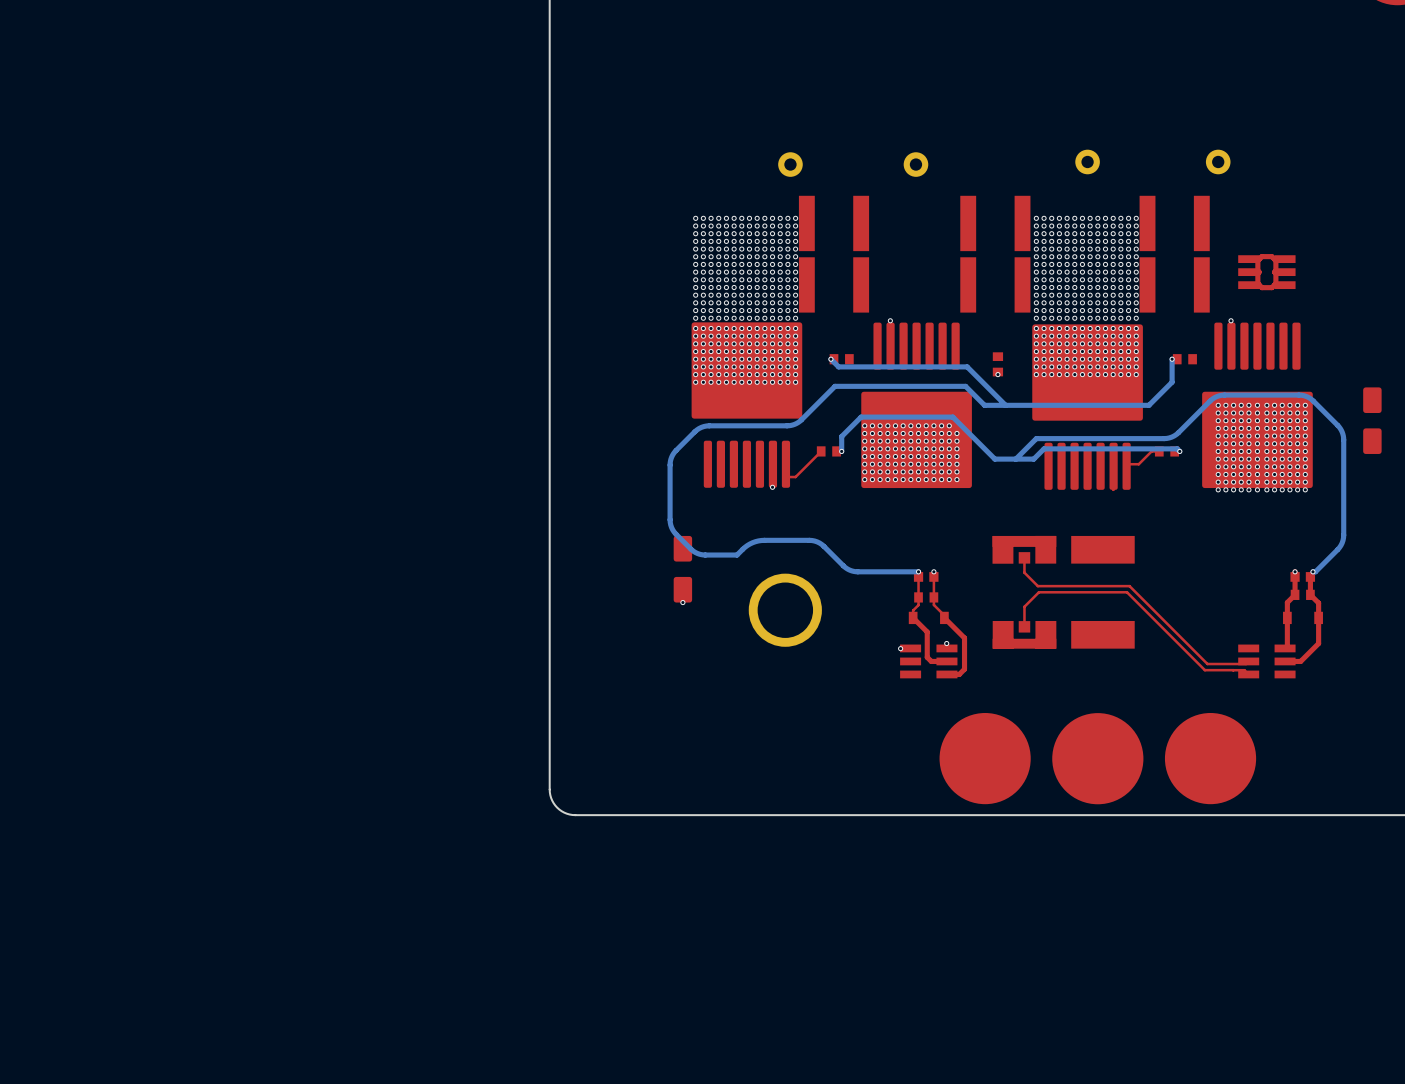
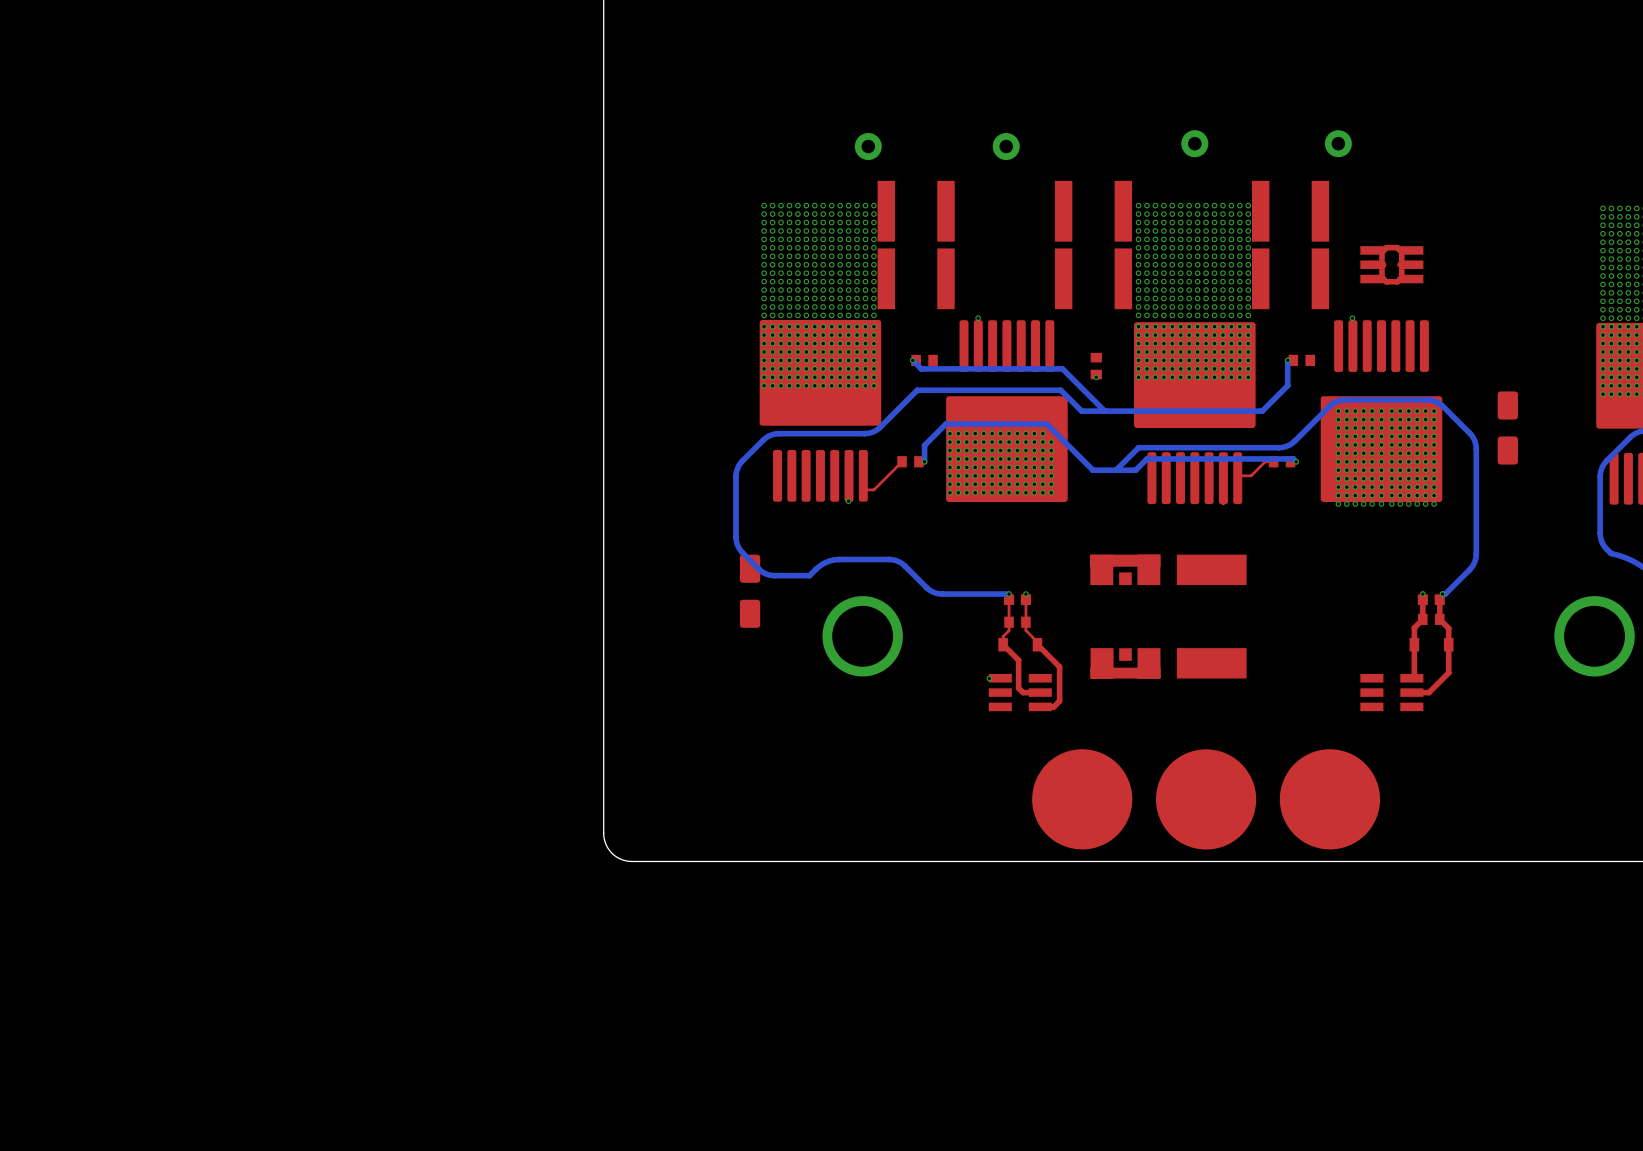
top track: (1024, 557) (1024, 572) (1037, 586) (1129, 586) (1207, 664) (1246, 664) (1248, 661) -> none
via: (682, 602) -> none
top track: (1024, 626) (1024, 606) (1038, 592) (1127, 592) (1204, 670) (1233, 670) -> none
via: (946, 643) -> none
top track: (1233, 670) (1244, 670) (1248, 674) -> none

